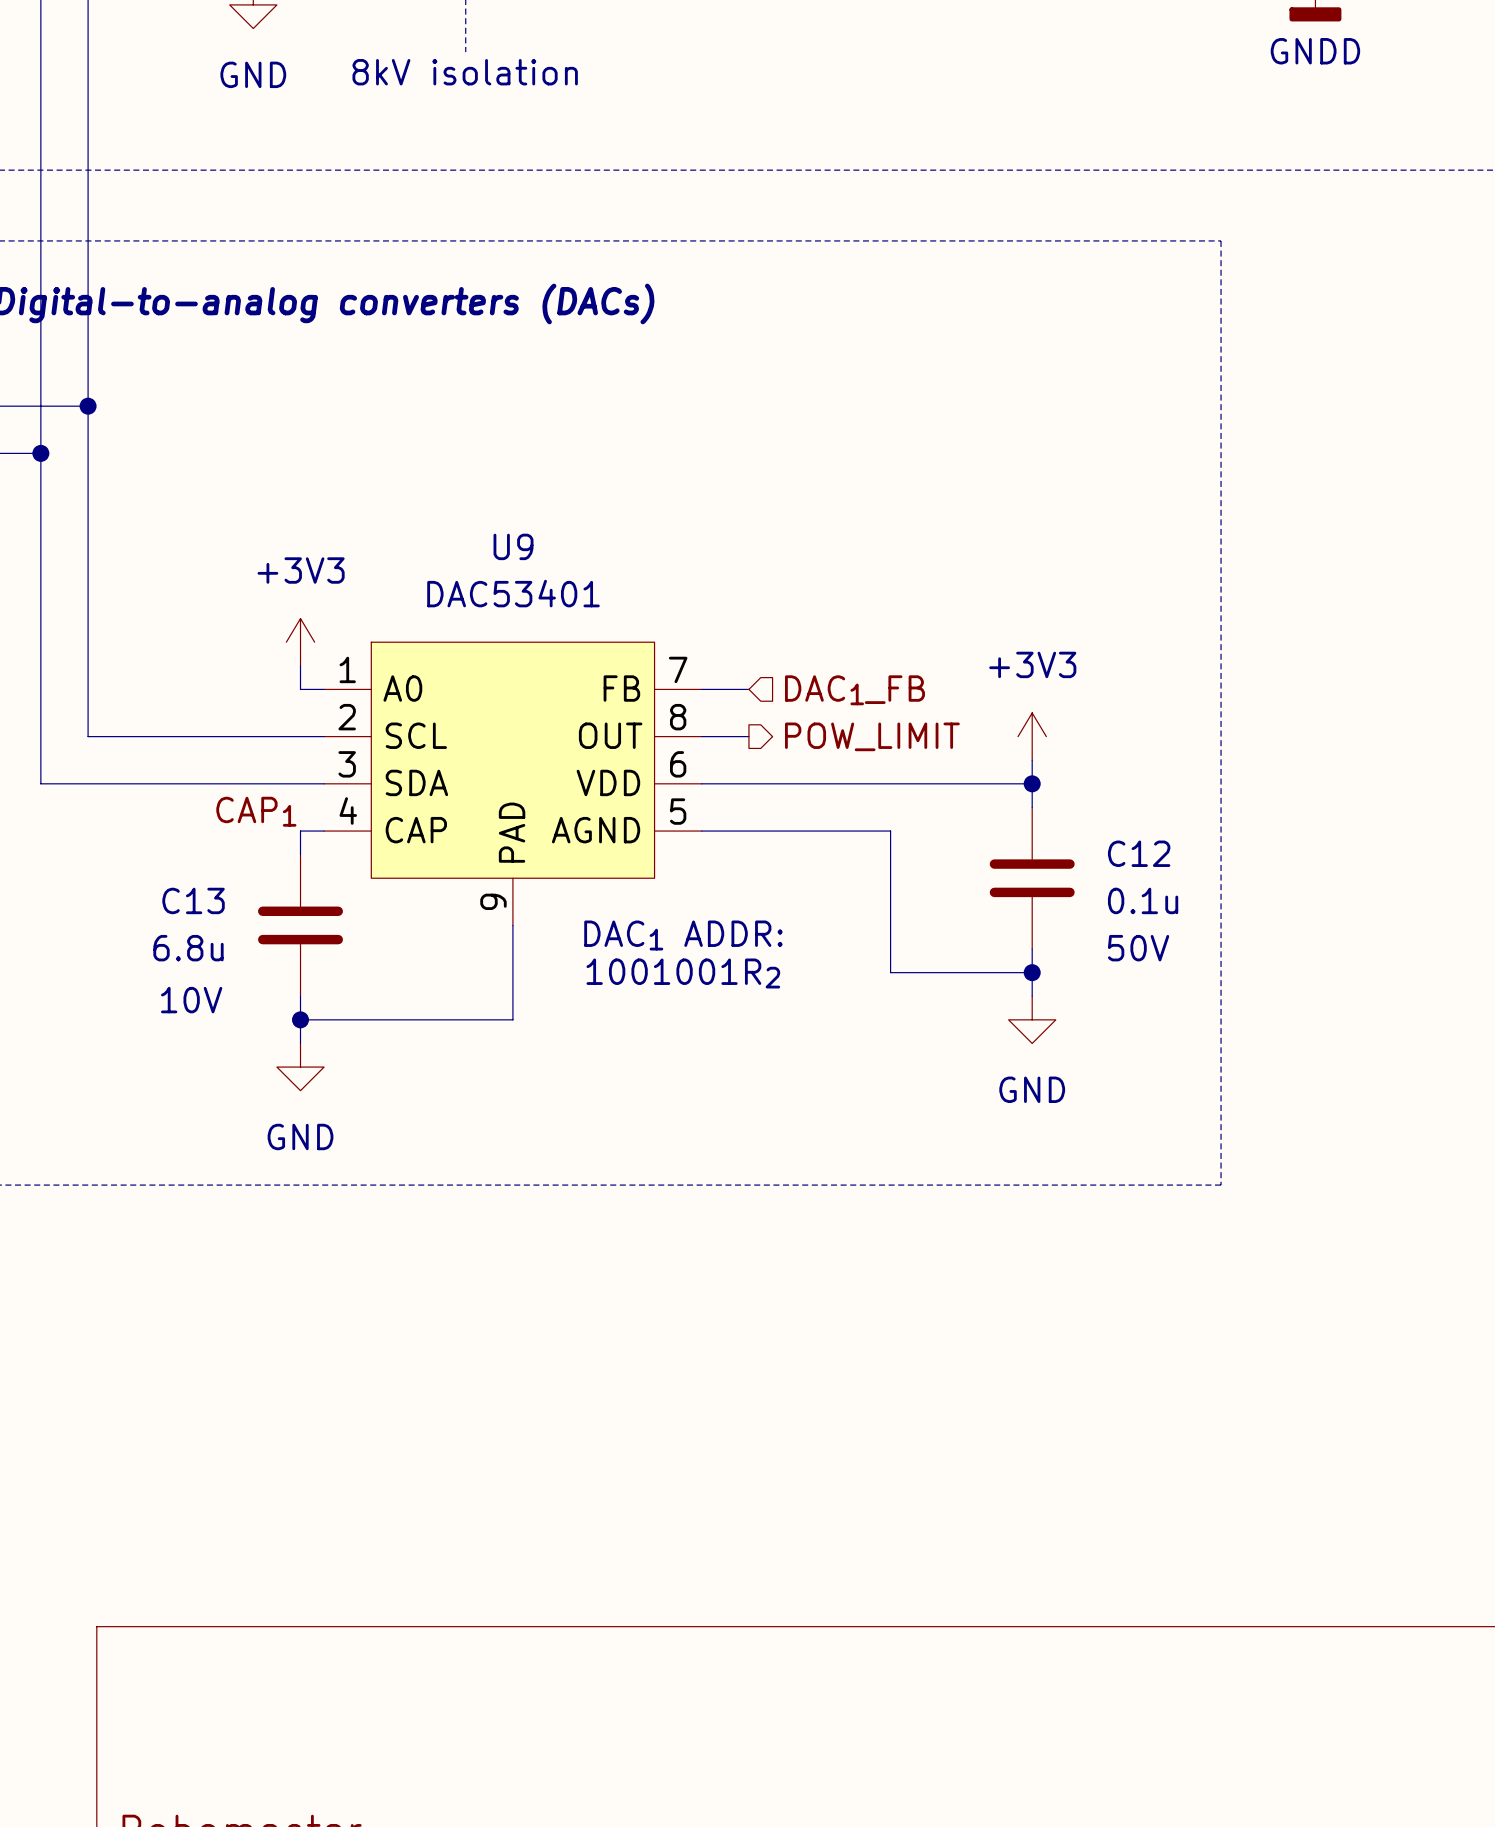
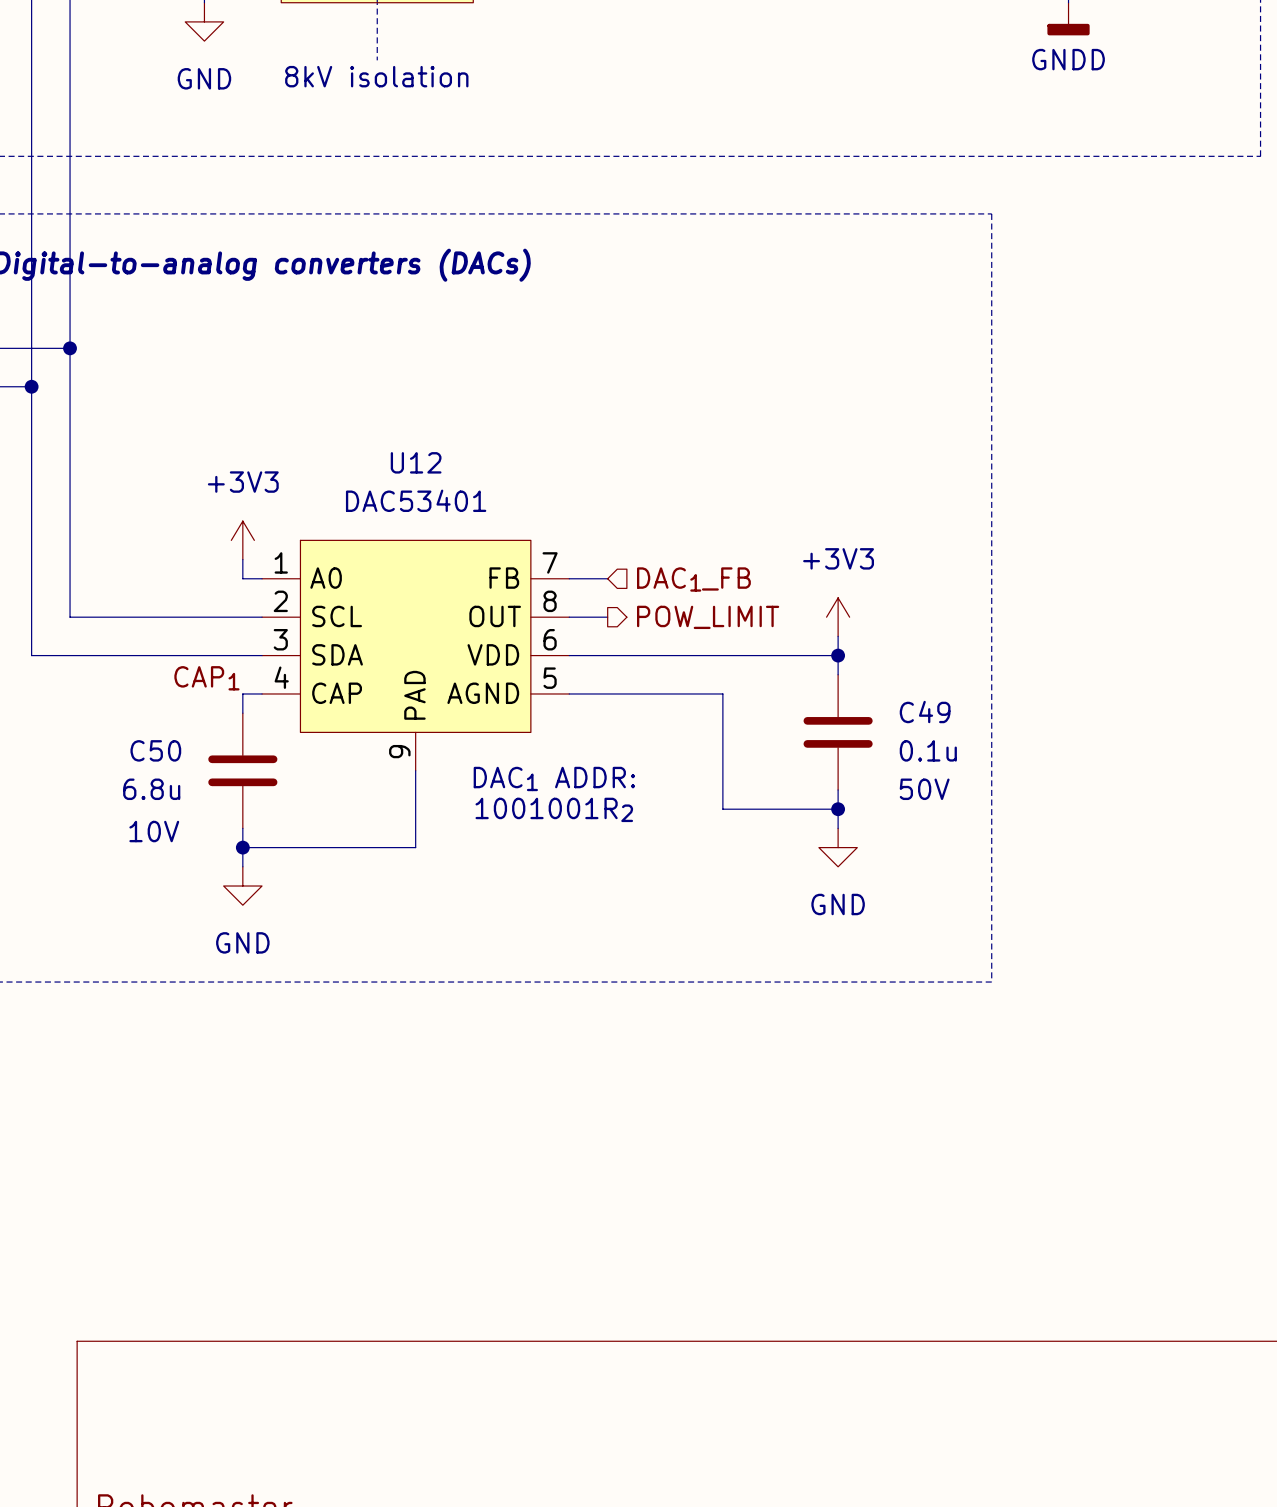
U9 name: U9 (513, 546) -> U12 (416, 462)
C12 name: C12 (1139, 853) -> C49 (925, 712)
C13 name: C13 (193, 900) -> C50 (155, 750)

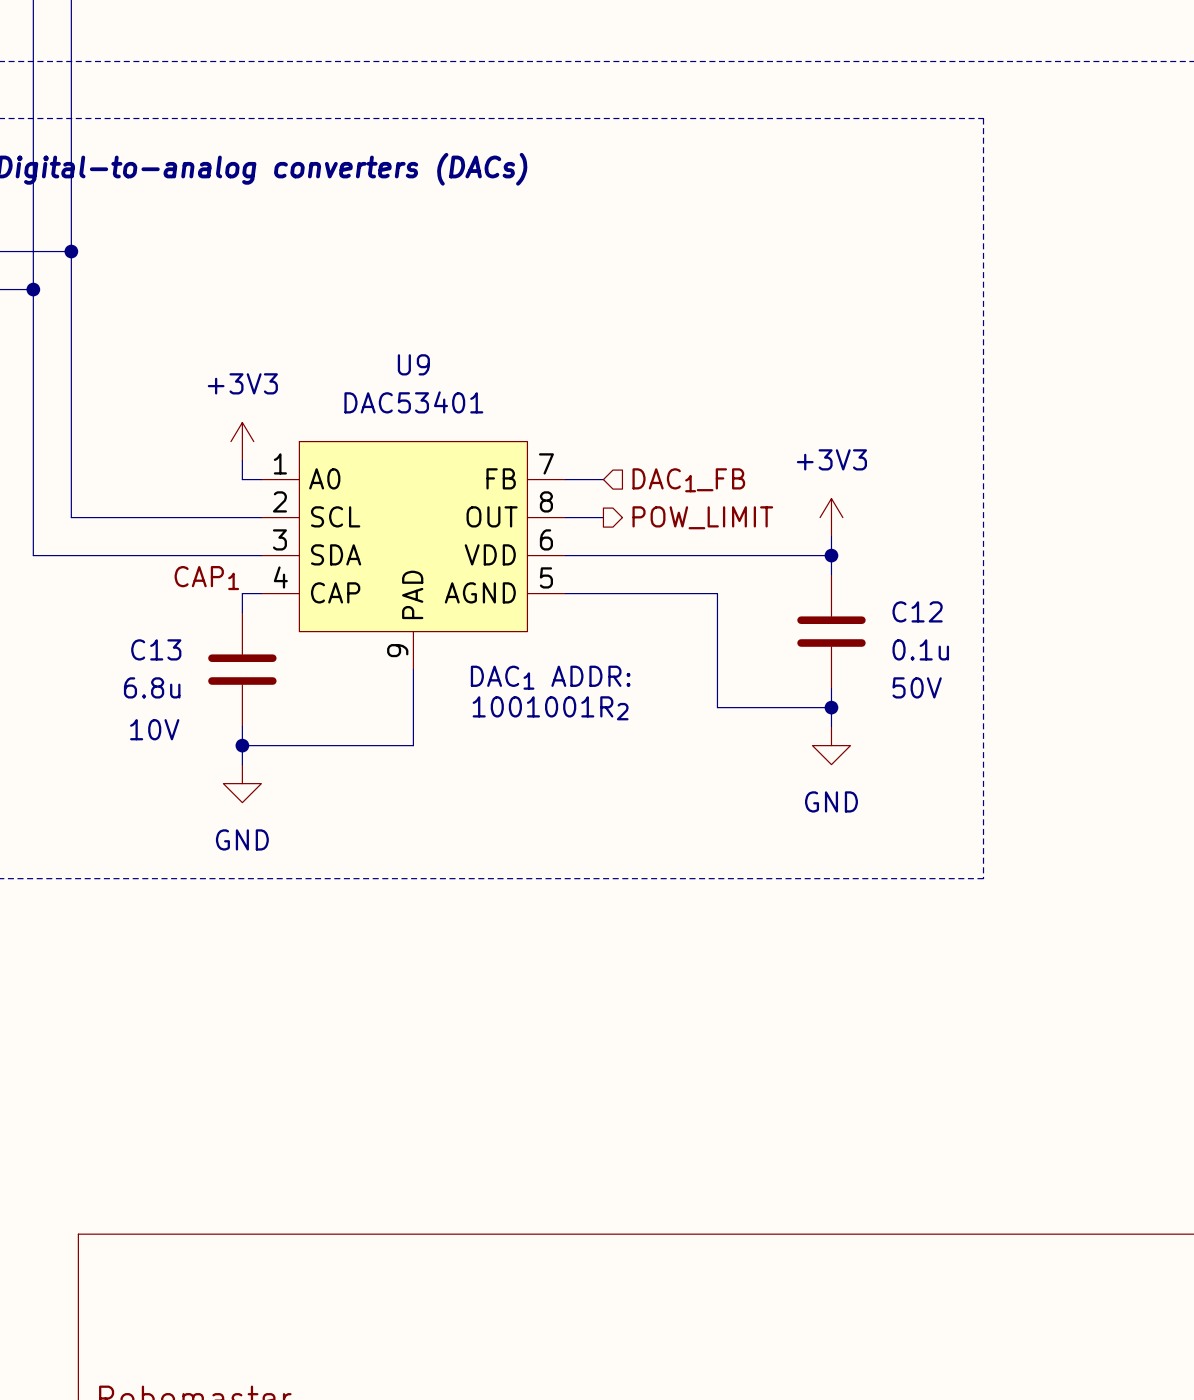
U12 name: U12 (416, 462) -> U9 (413, 364)
C49 name: C49 (925, 712) -> C12 (917, 611)
C50 name: C50 (155, 750) -> C13 (156, 649)

